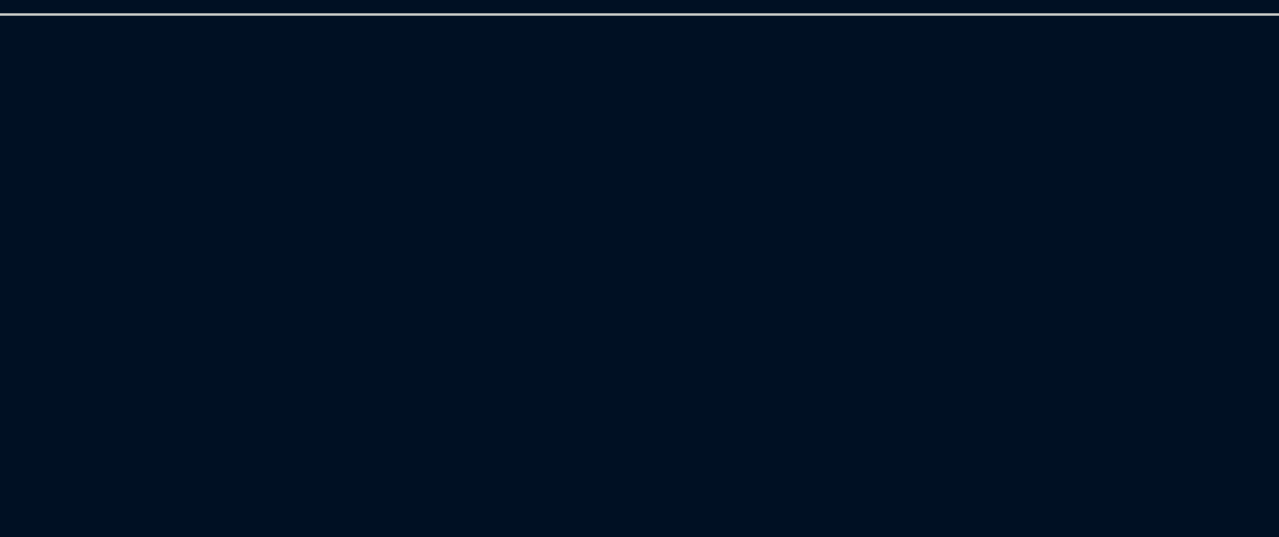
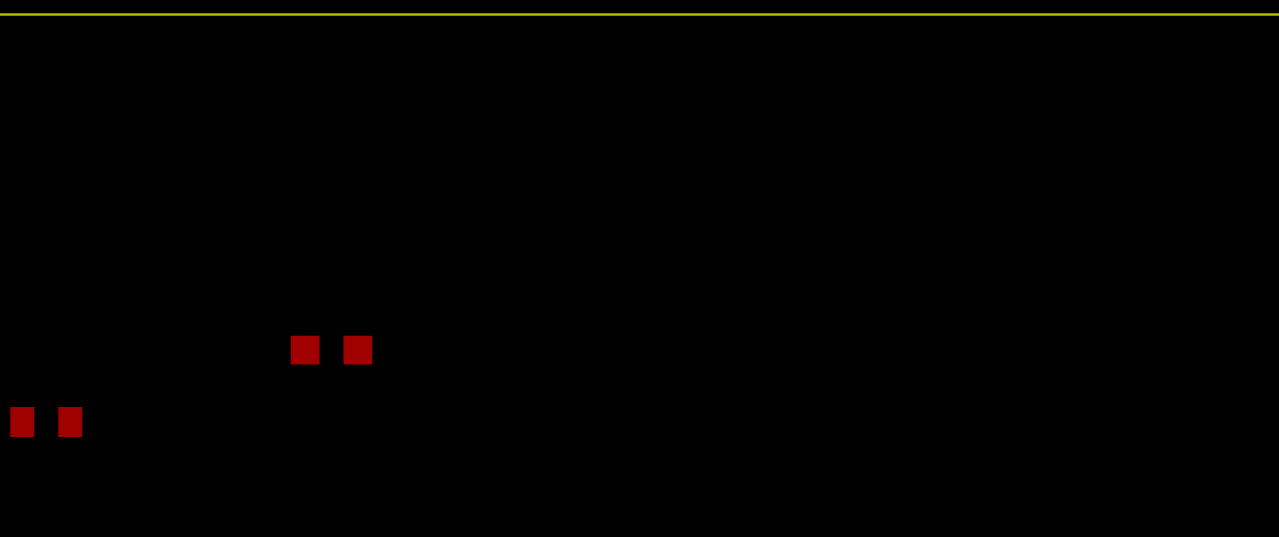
part: none -> (331, 350)
part: none -> (46, 421)

